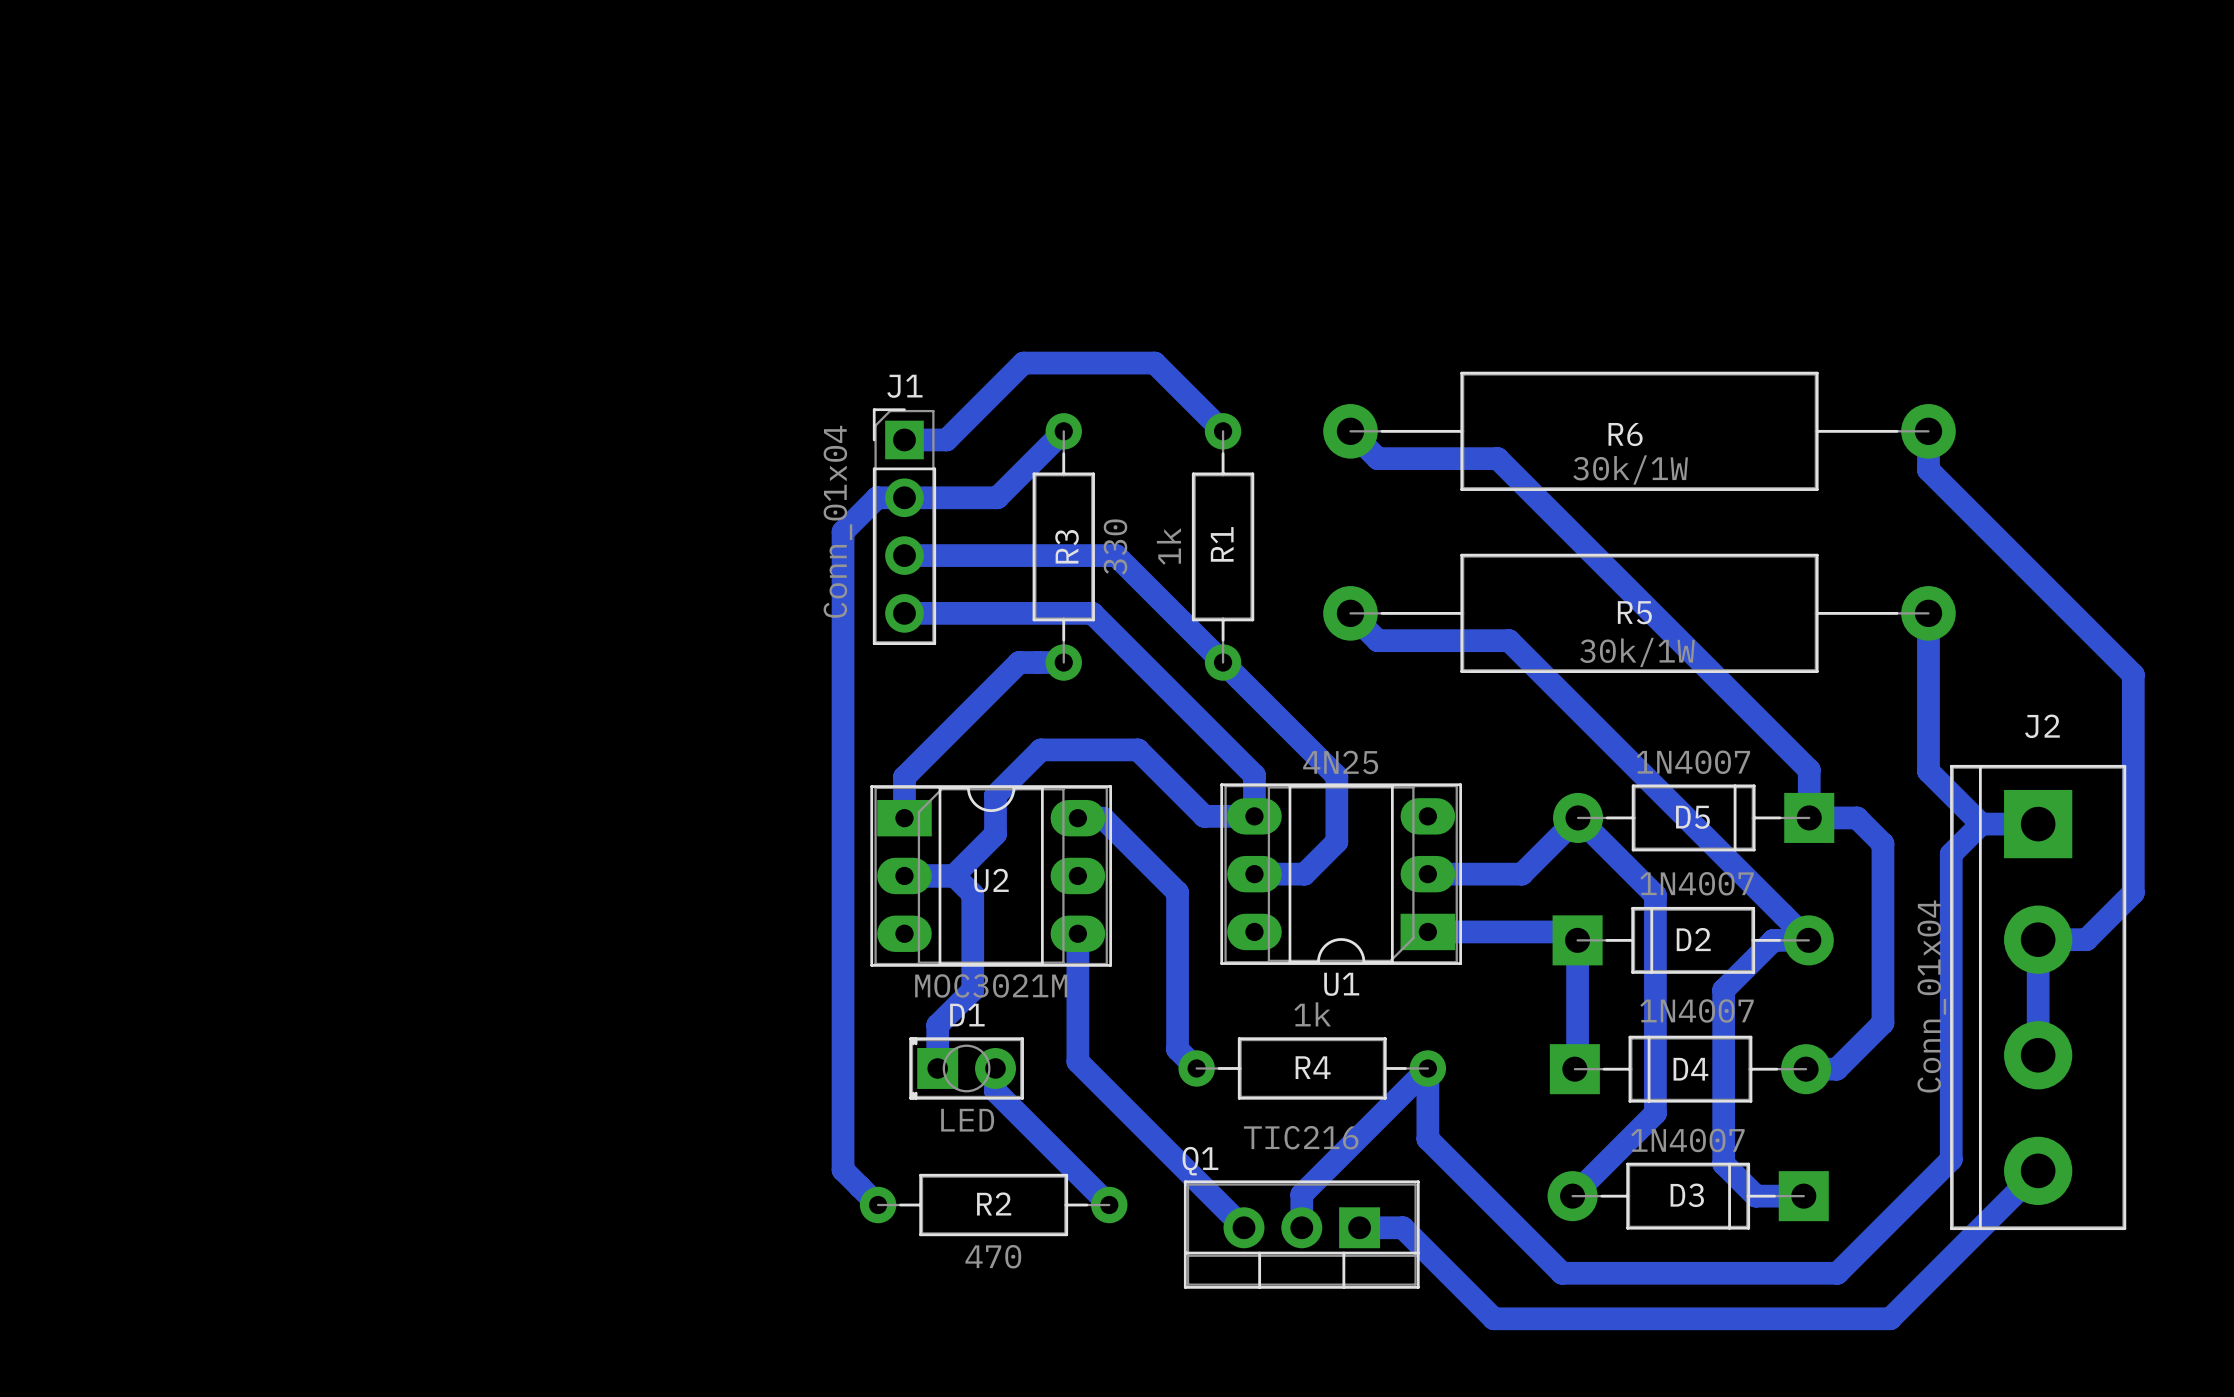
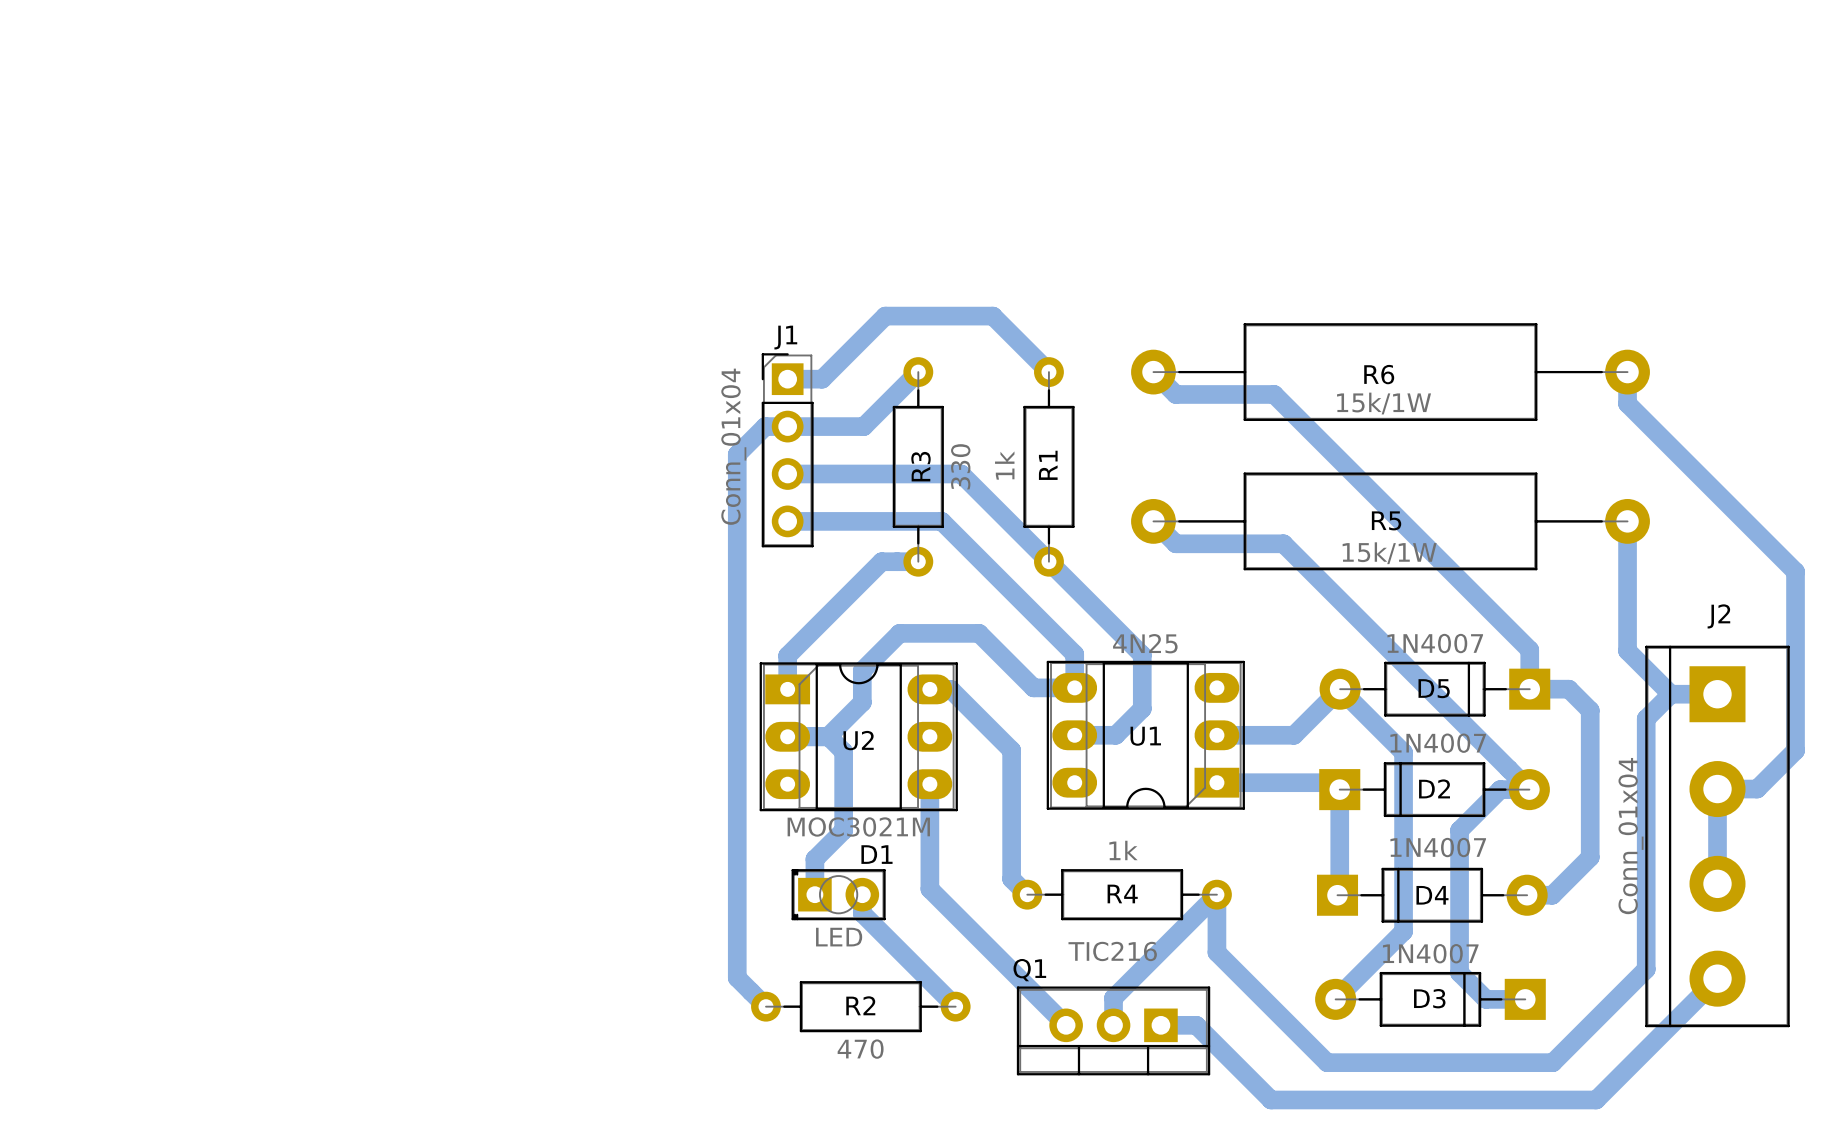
R6 value: 30k/1W (1630, 469) -> 15k/1W (1384, 403)
R5 value: 30k/1W (1637, 652) -> 15k/1W (1389, 553)
U1 name position: U1 (1341, 984) -> U1 (1145, 736)
D1 name position: D1 (967, 1015) -> D1 (876, 854)

